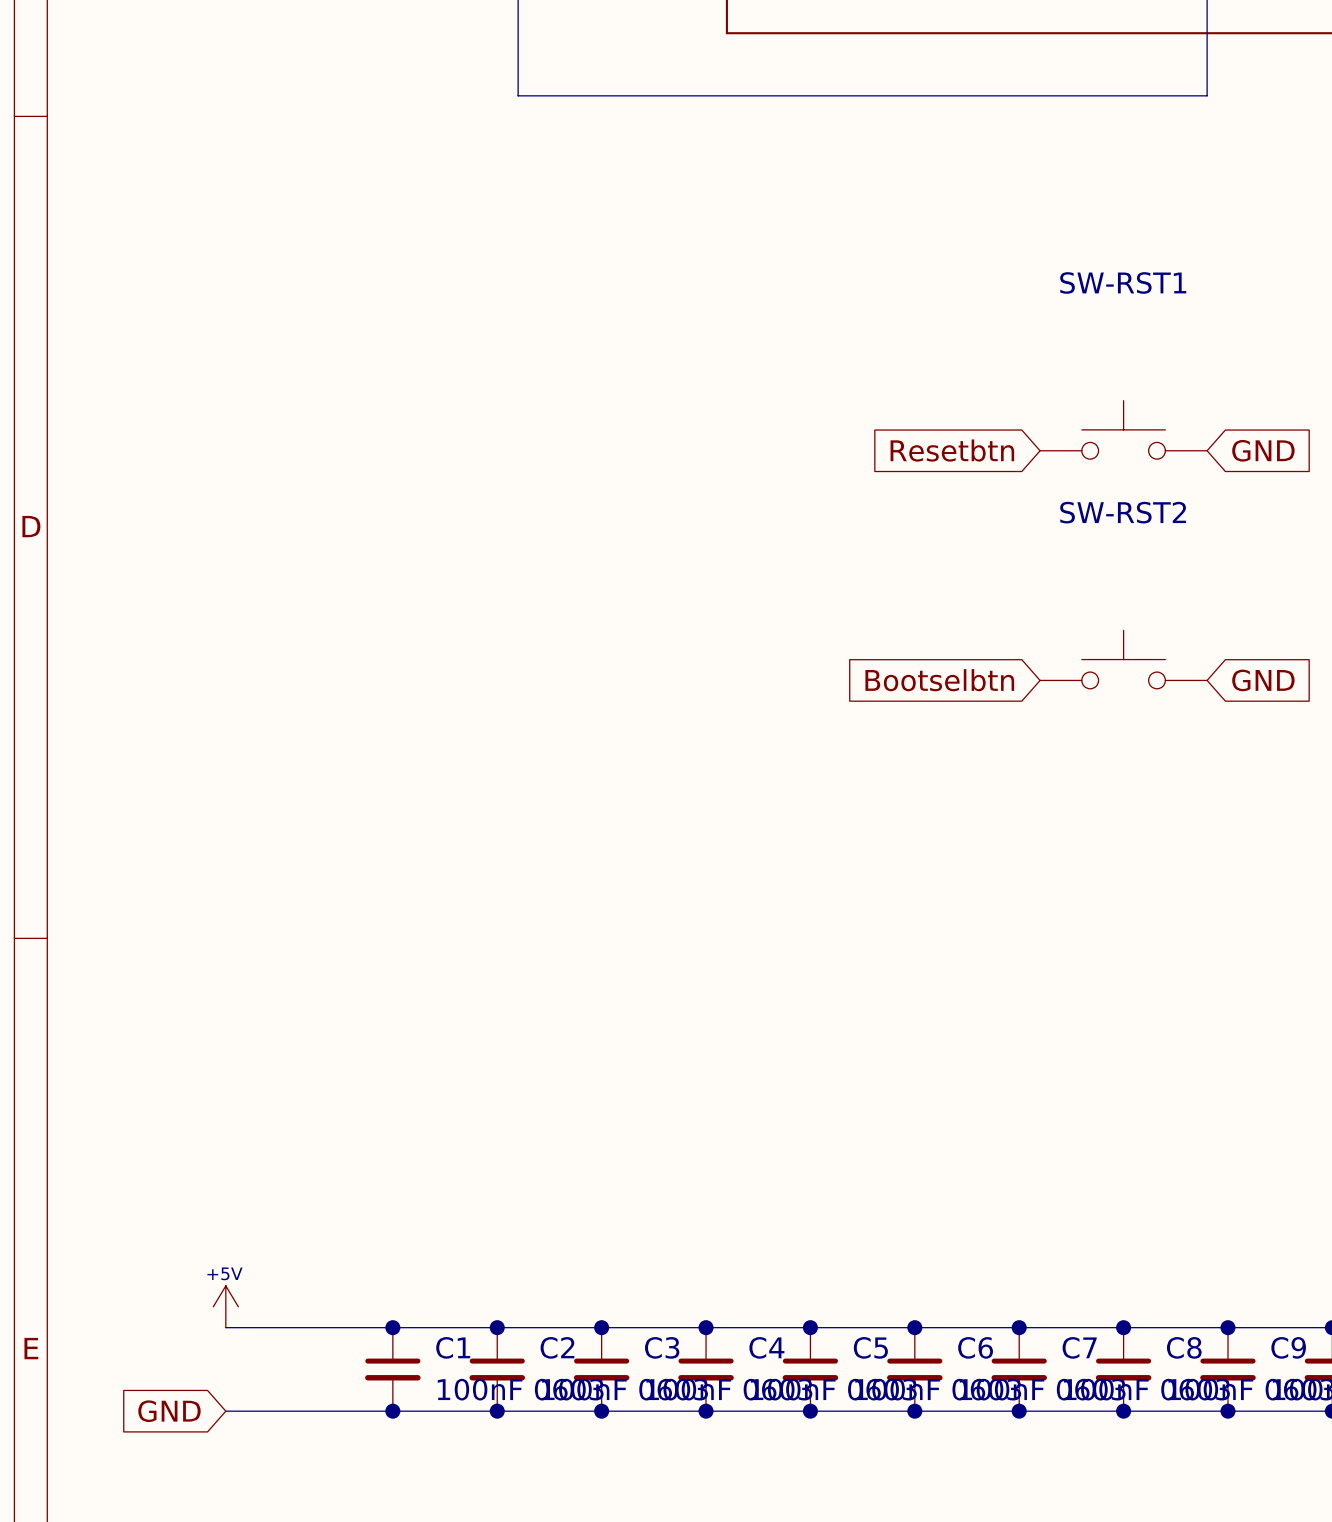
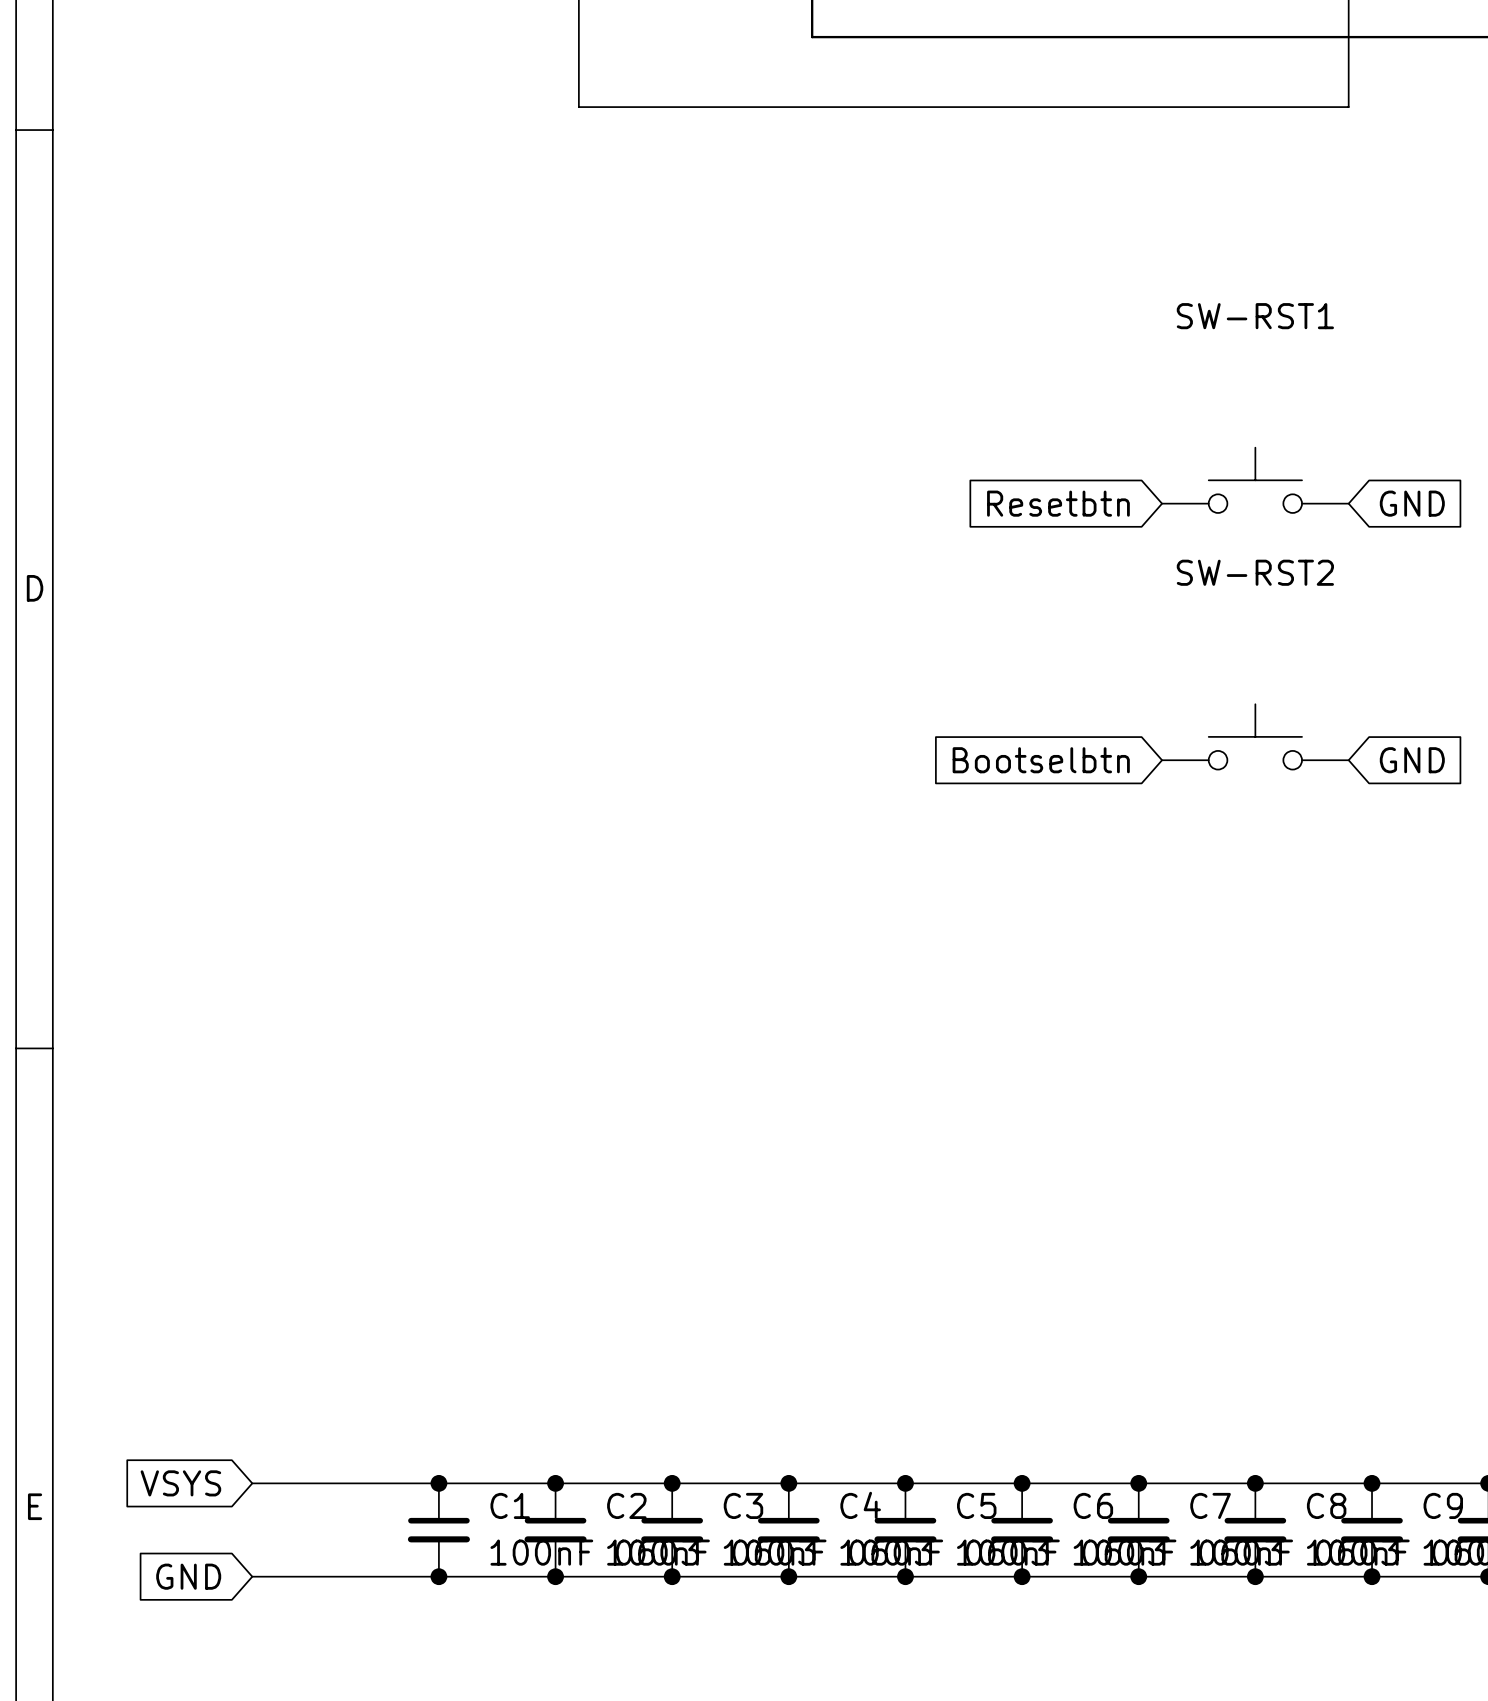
power symbol: +5V (225, 1306) -> none
global label: none -> VSYS (180, 1483)

